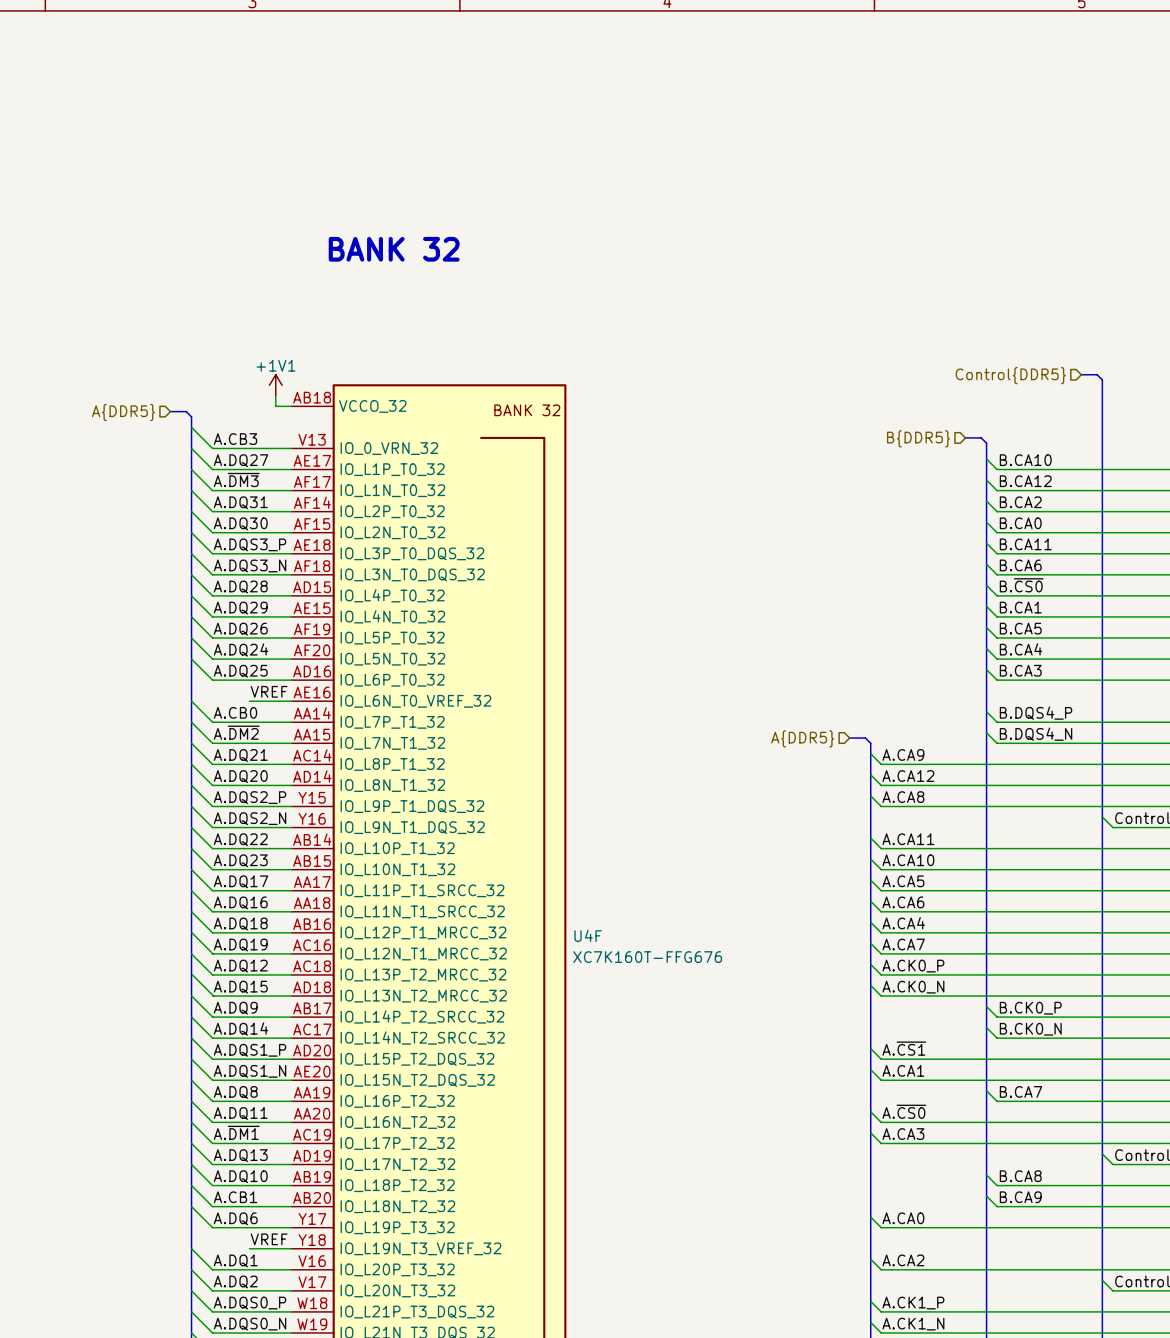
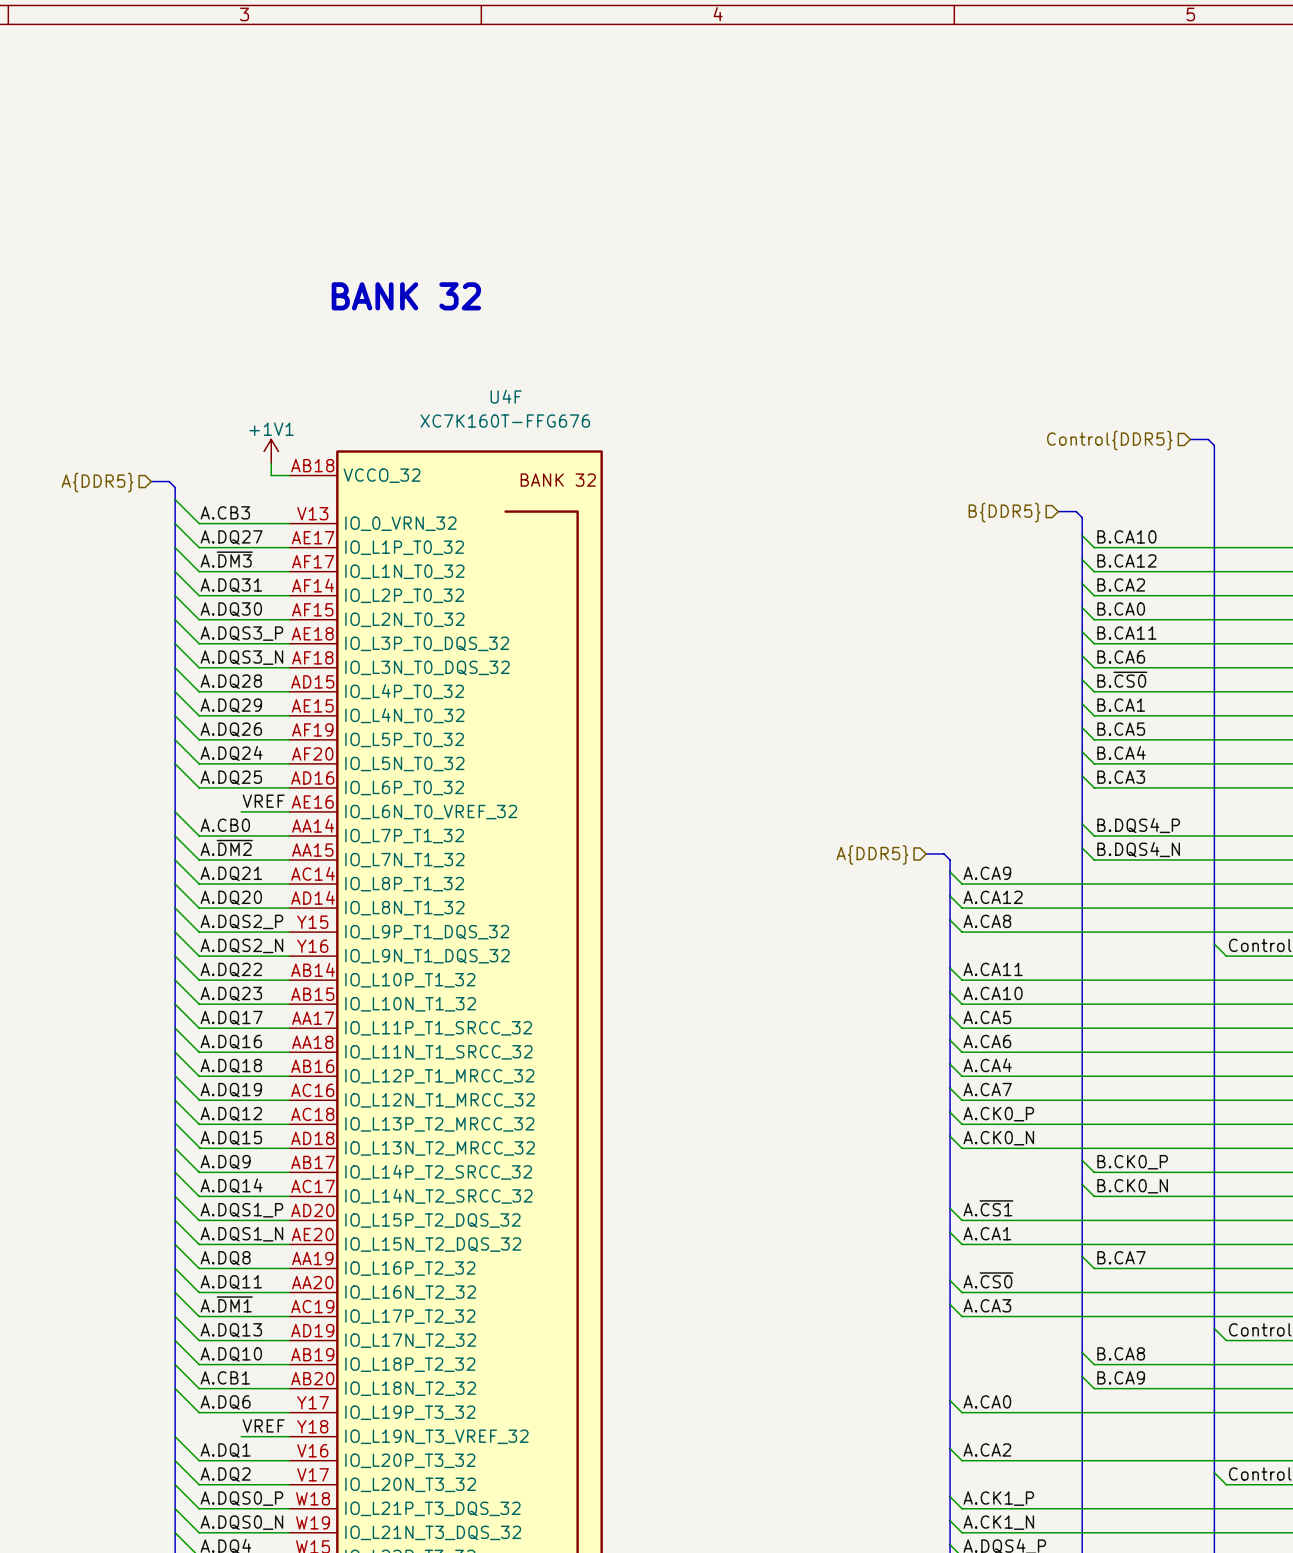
U4F name position: U4F (588, 935) -> U4F (506, 396)
U4F value position: XC7K160T-FFG676 (647, 957) -> XC7K160T-FFG676 (505, 421)

